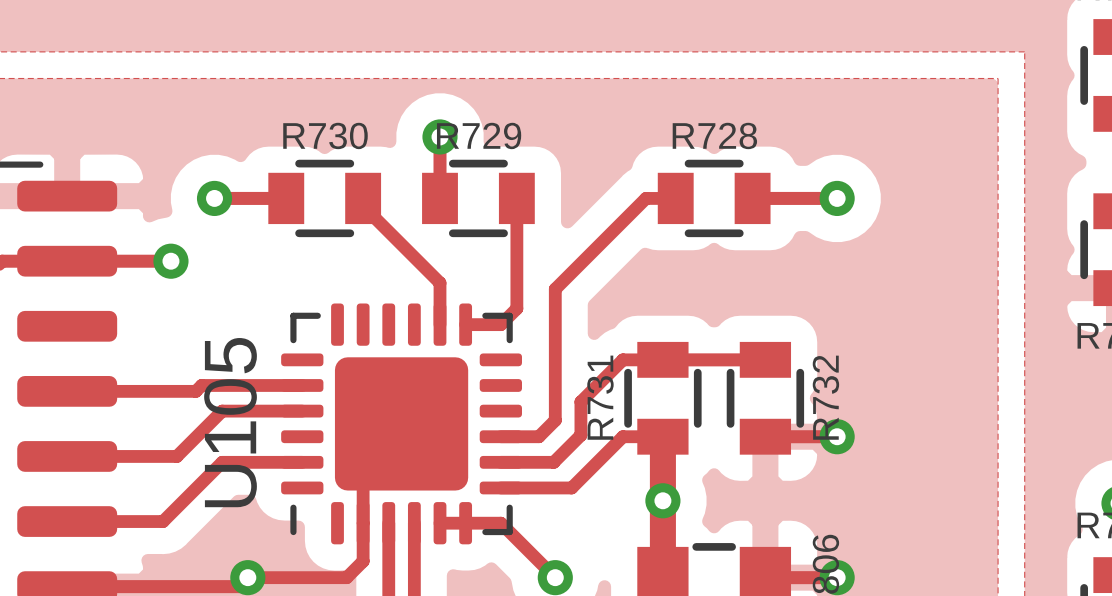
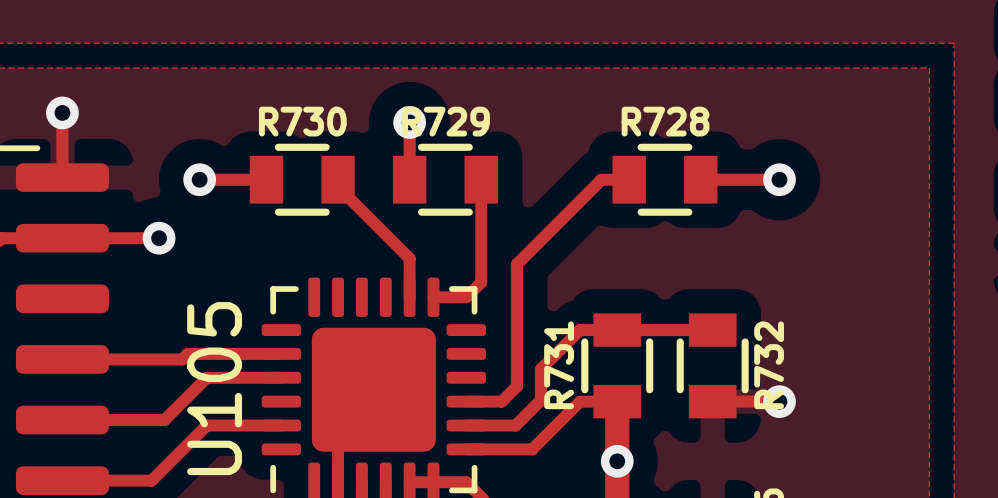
track: none -> (62, 112) (62, 177)
via: none -> (62, 112)

